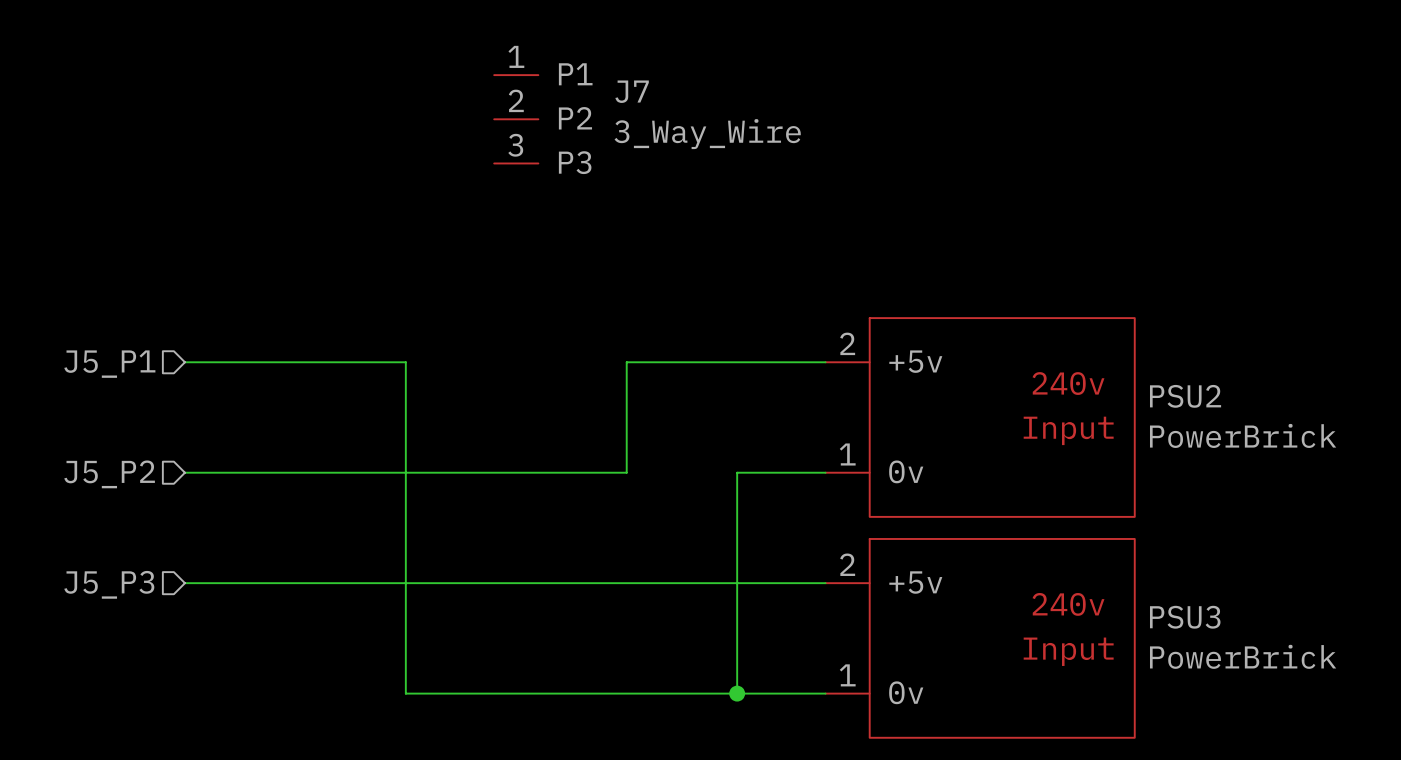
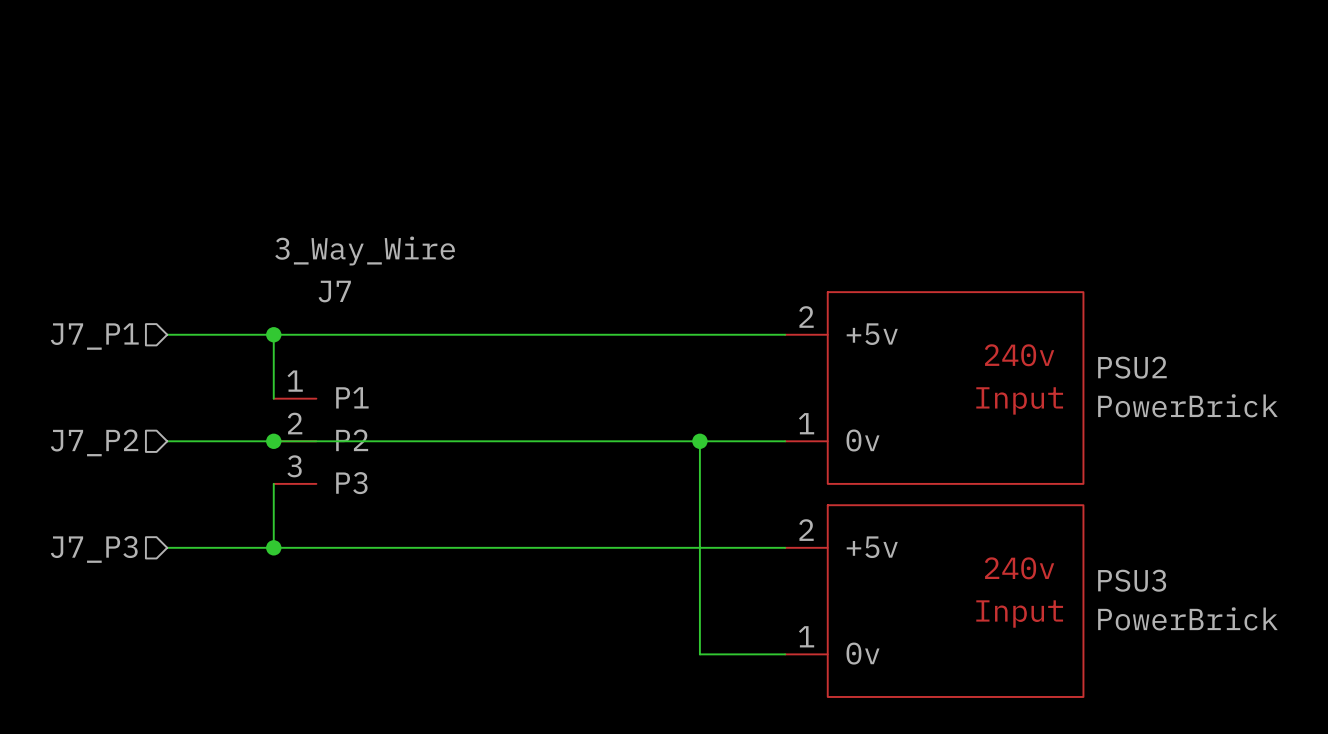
J7 name position: J7 (632, 91) -> J7 (334, 291)
J7 position: (516, 119) -> (295, 441)
J7 value position: 3_Way_Wire (707, 134) -> 3_Way_Wire (365, 251)
wire: none -> (273, 334) (273, 398)
junction: none -> (273, 334)
wire: (405, 362) (405, 693) (737, 693) -> (380, 334) (593, 334)
wire: (626, 362) (626, 472) -> (699, 441) (593, 441)
hierarchical label: J5_P1 (109, 364) -> J7_P1 (94, 336)
junction: none -> (273, 441)
junction: none -> (699, 441)
hierarchical label: J5_P2 (109, 474) -> J7_P2 (94, 442)
wire: none -> (273, 483) (273, 547)
junction: none -> (273, 547)
hierarchical label: J5_P3 (109, 584) -> J7_P3 (94, 549)
junction: (737, 693) -> none

